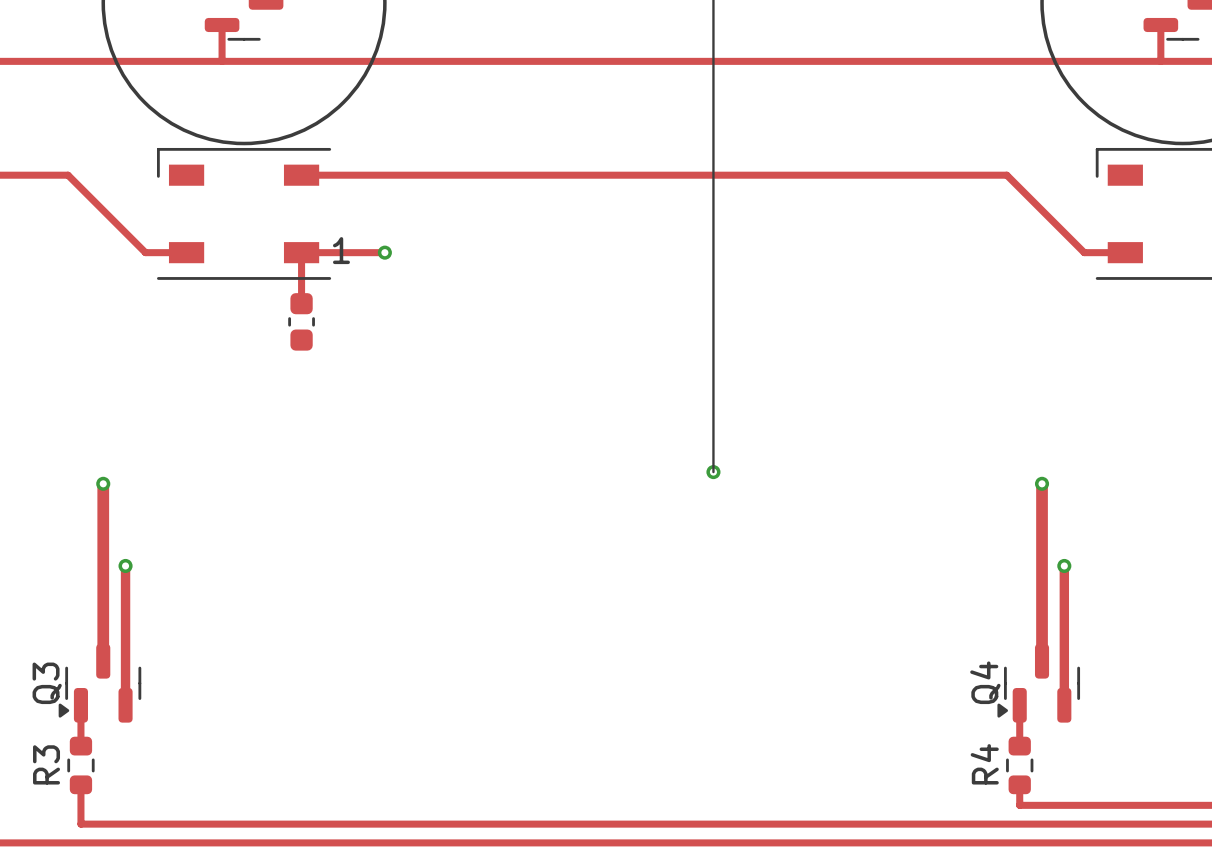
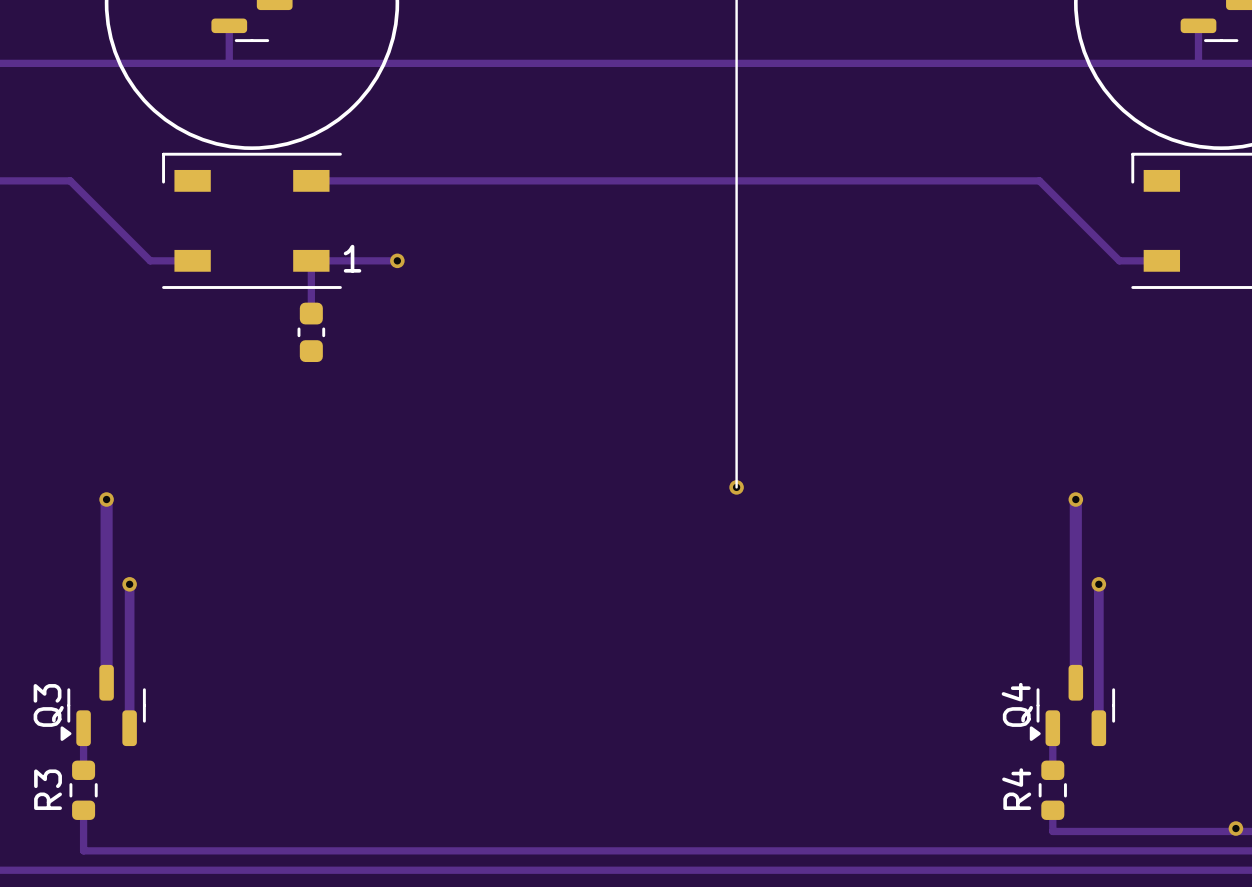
via: none -> (1235, 828)

